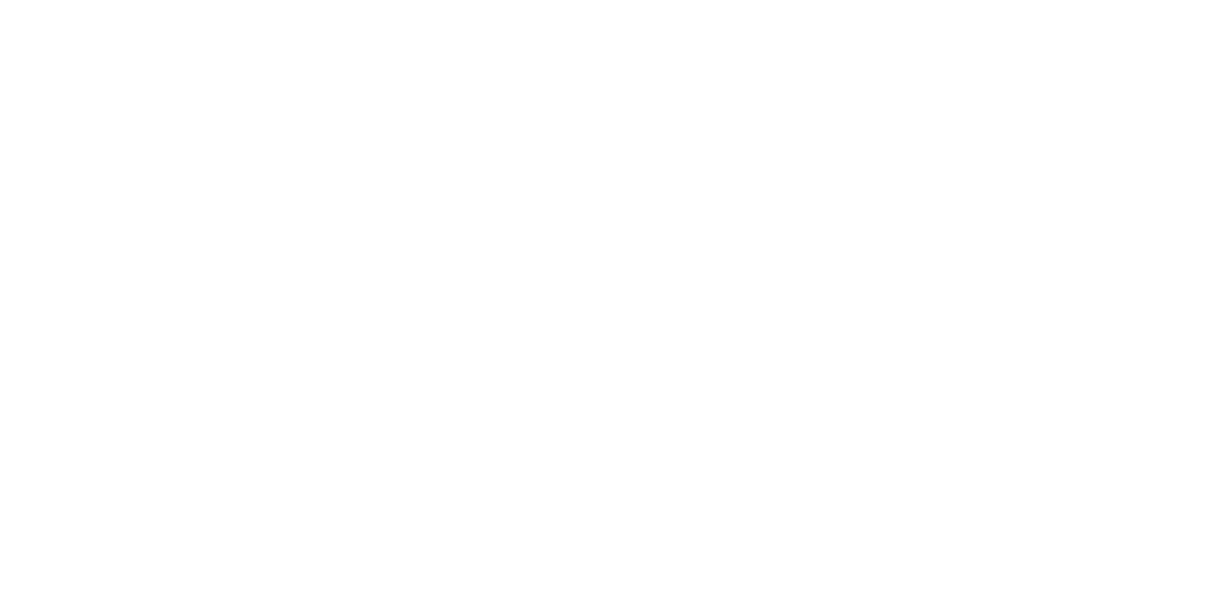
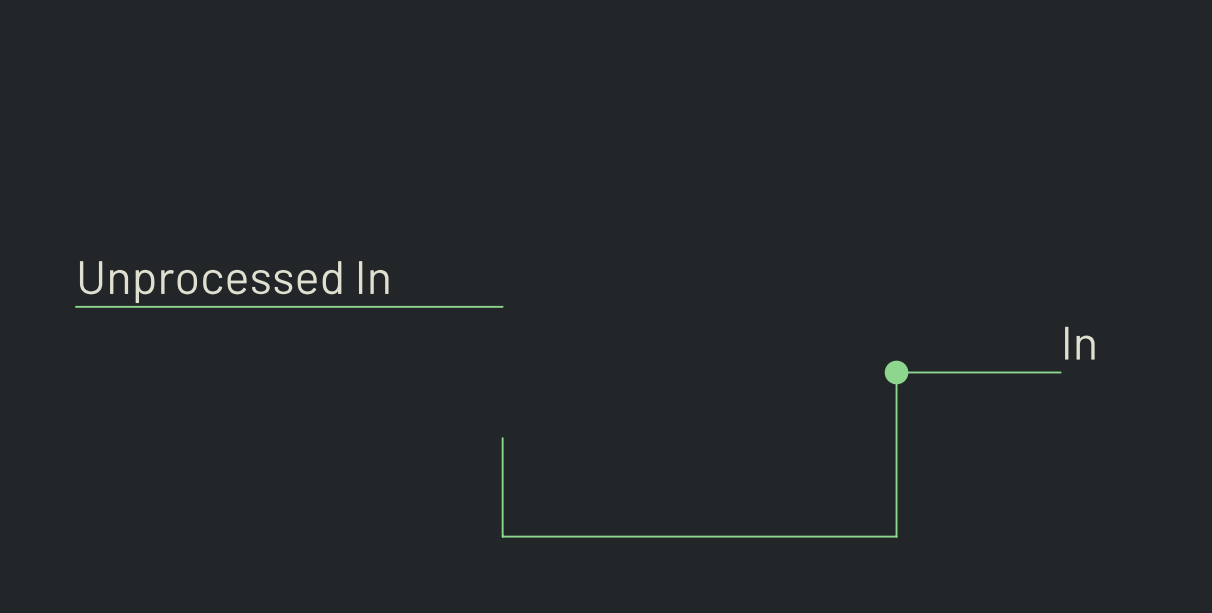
label: none -> Unprocessed In (234, 282)
wire: none -> (75, 306) (502, 306)
label: none -> In (1079, 343)
junction: none -> (896, 372)
wire: none -> (1060, 372) (896, 372) (896, 536) (502, 536) (502, 438)

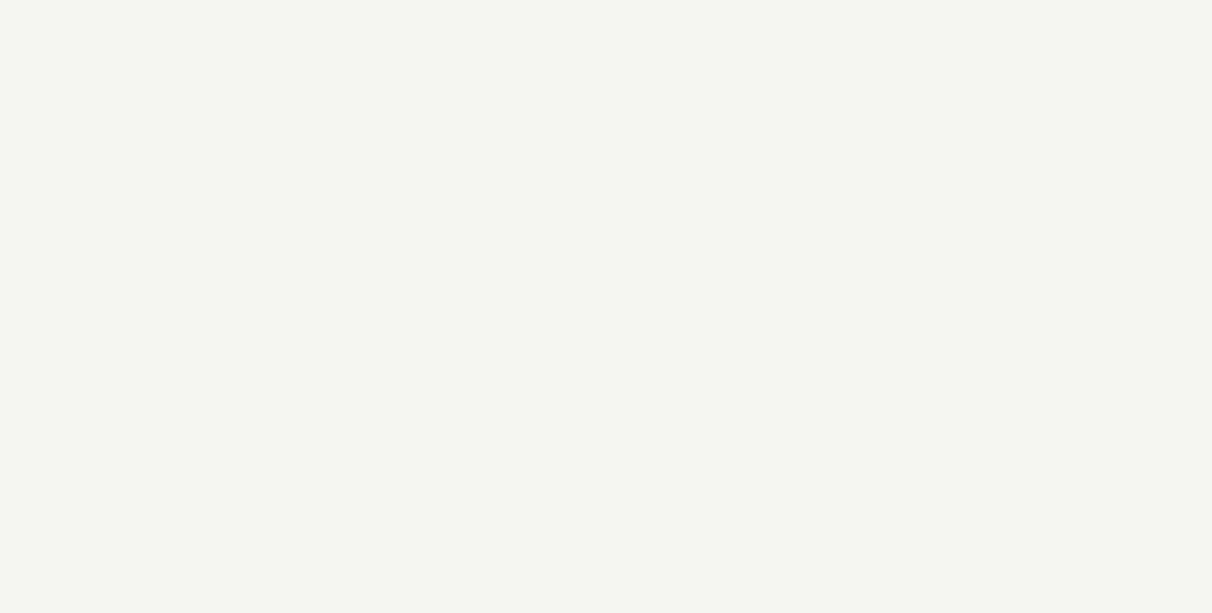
label: Unprocessed In (234, 282) -> none
wire: (75, 306) (502, 306) -> none
label: In (1079, 343) -> none
junction: (896, 372) -> none
wire: (1060, 372) (896, 372) (896, 536) (502, 536) (502, 438) -> none

